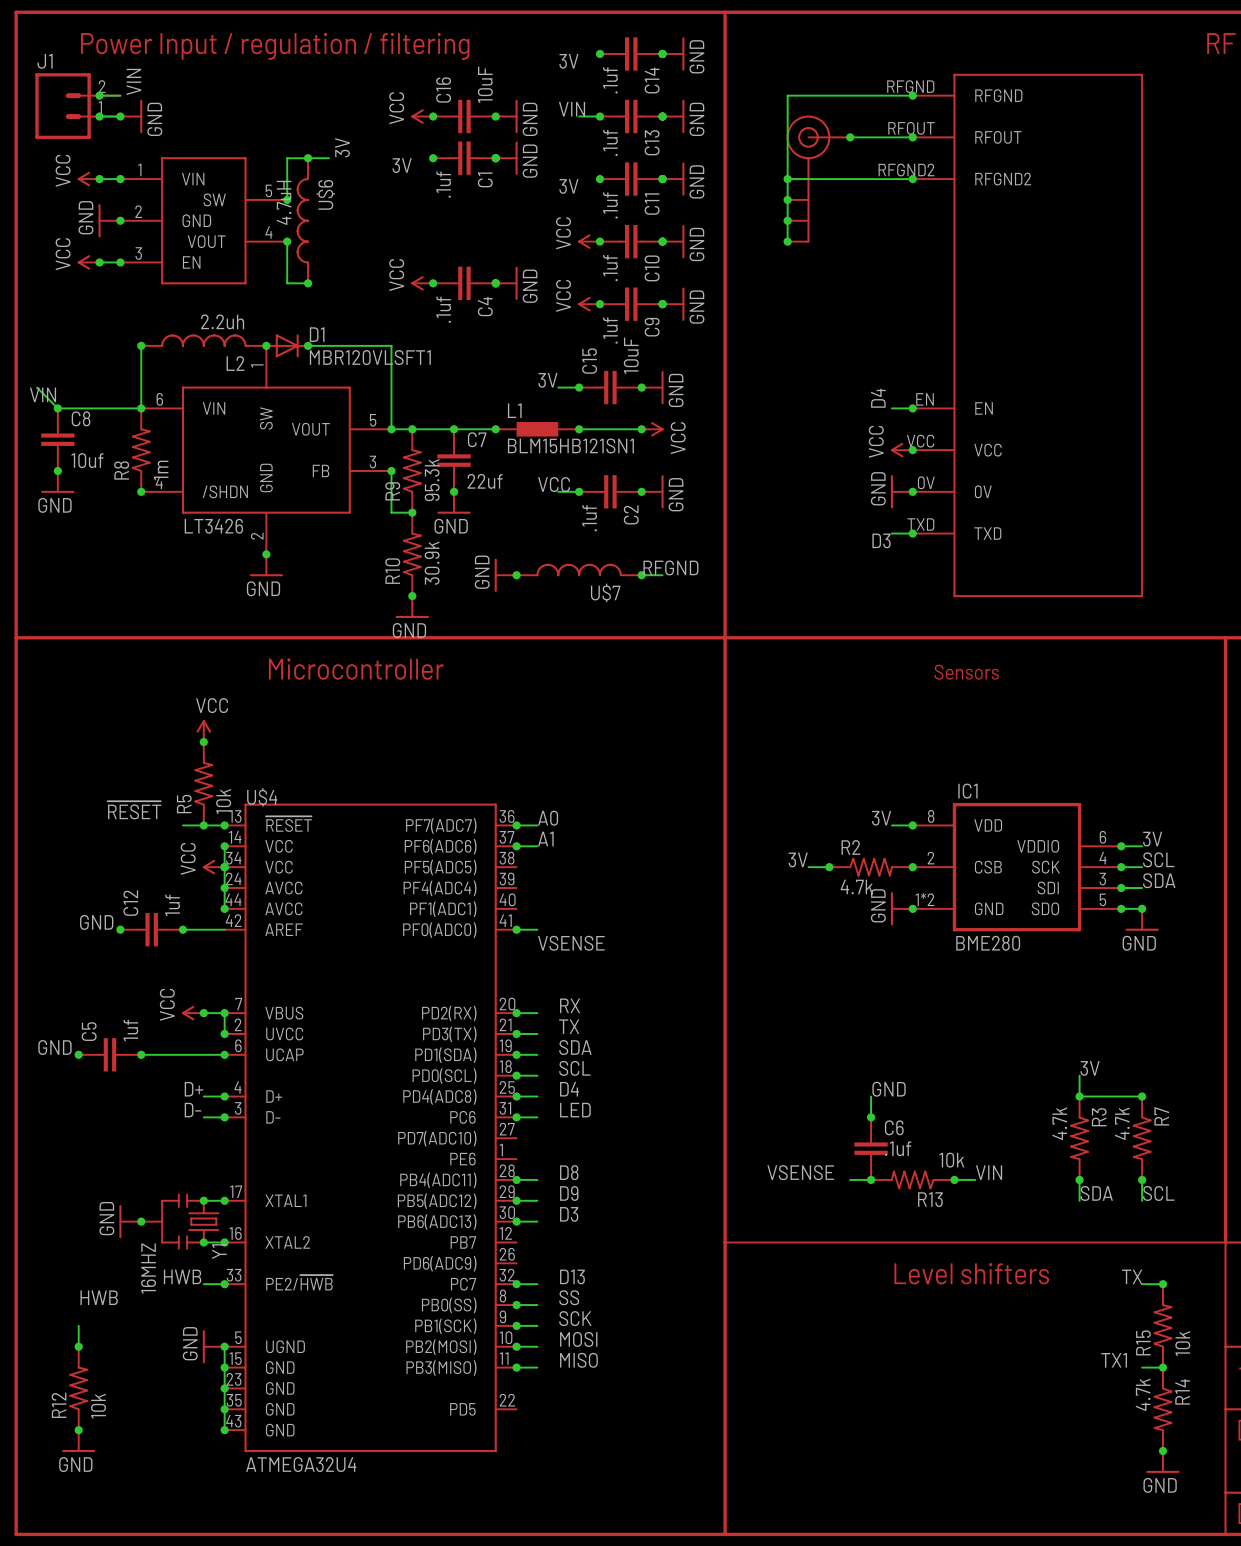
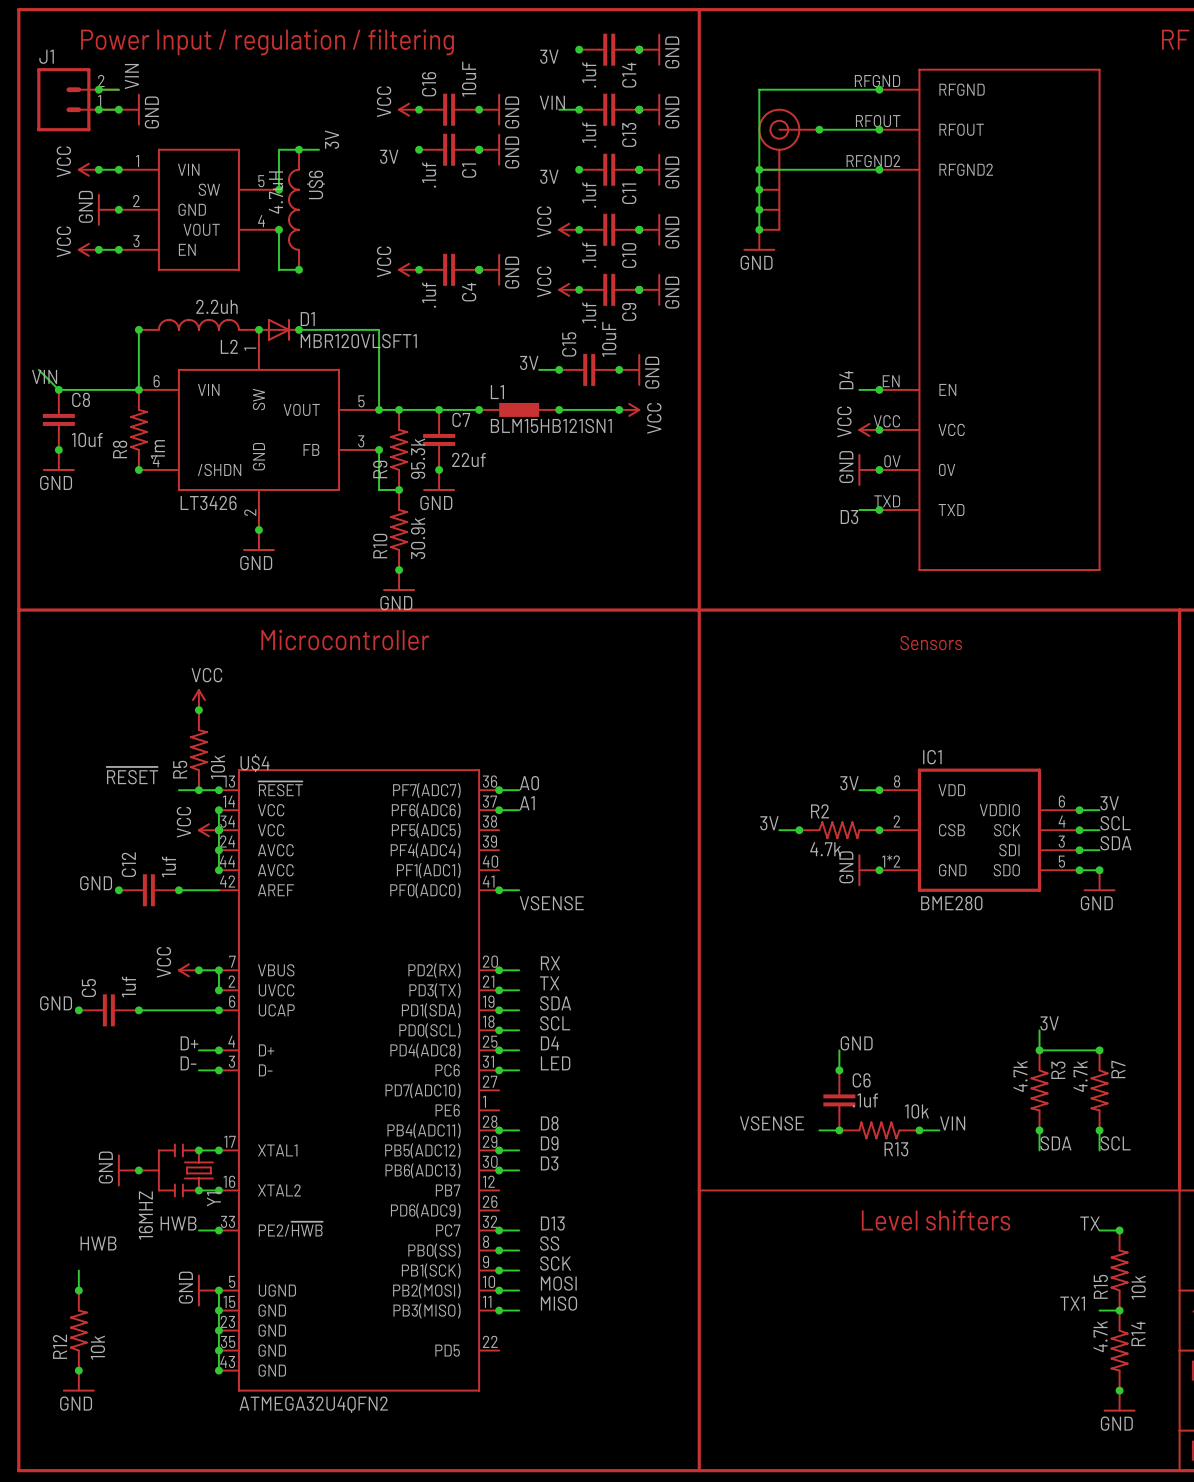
power symbol: none -> GND (759, 240)
label: VCC (554, 484) -> none
wire: (558, 491) (579, 491) -> none
junction: (579, 491) -> none
C2: .1uf (610, 491) -> none
junction: (641, 491) -> none
power symbol: GND (652, 491) -> none
label: RFGND (670, 567) -> none
U$7: (579, 570) -> none
power symbol: GND (505, 575) -> none
junction: (516, 575) -> none
wire: (641, 575) (662, 575) -> none
junction: (641, 575) -> none
U$4 value: ATMEGA32U4 (301, 1464) -> ATMEGA32U4QFN2 (313, 1404)

